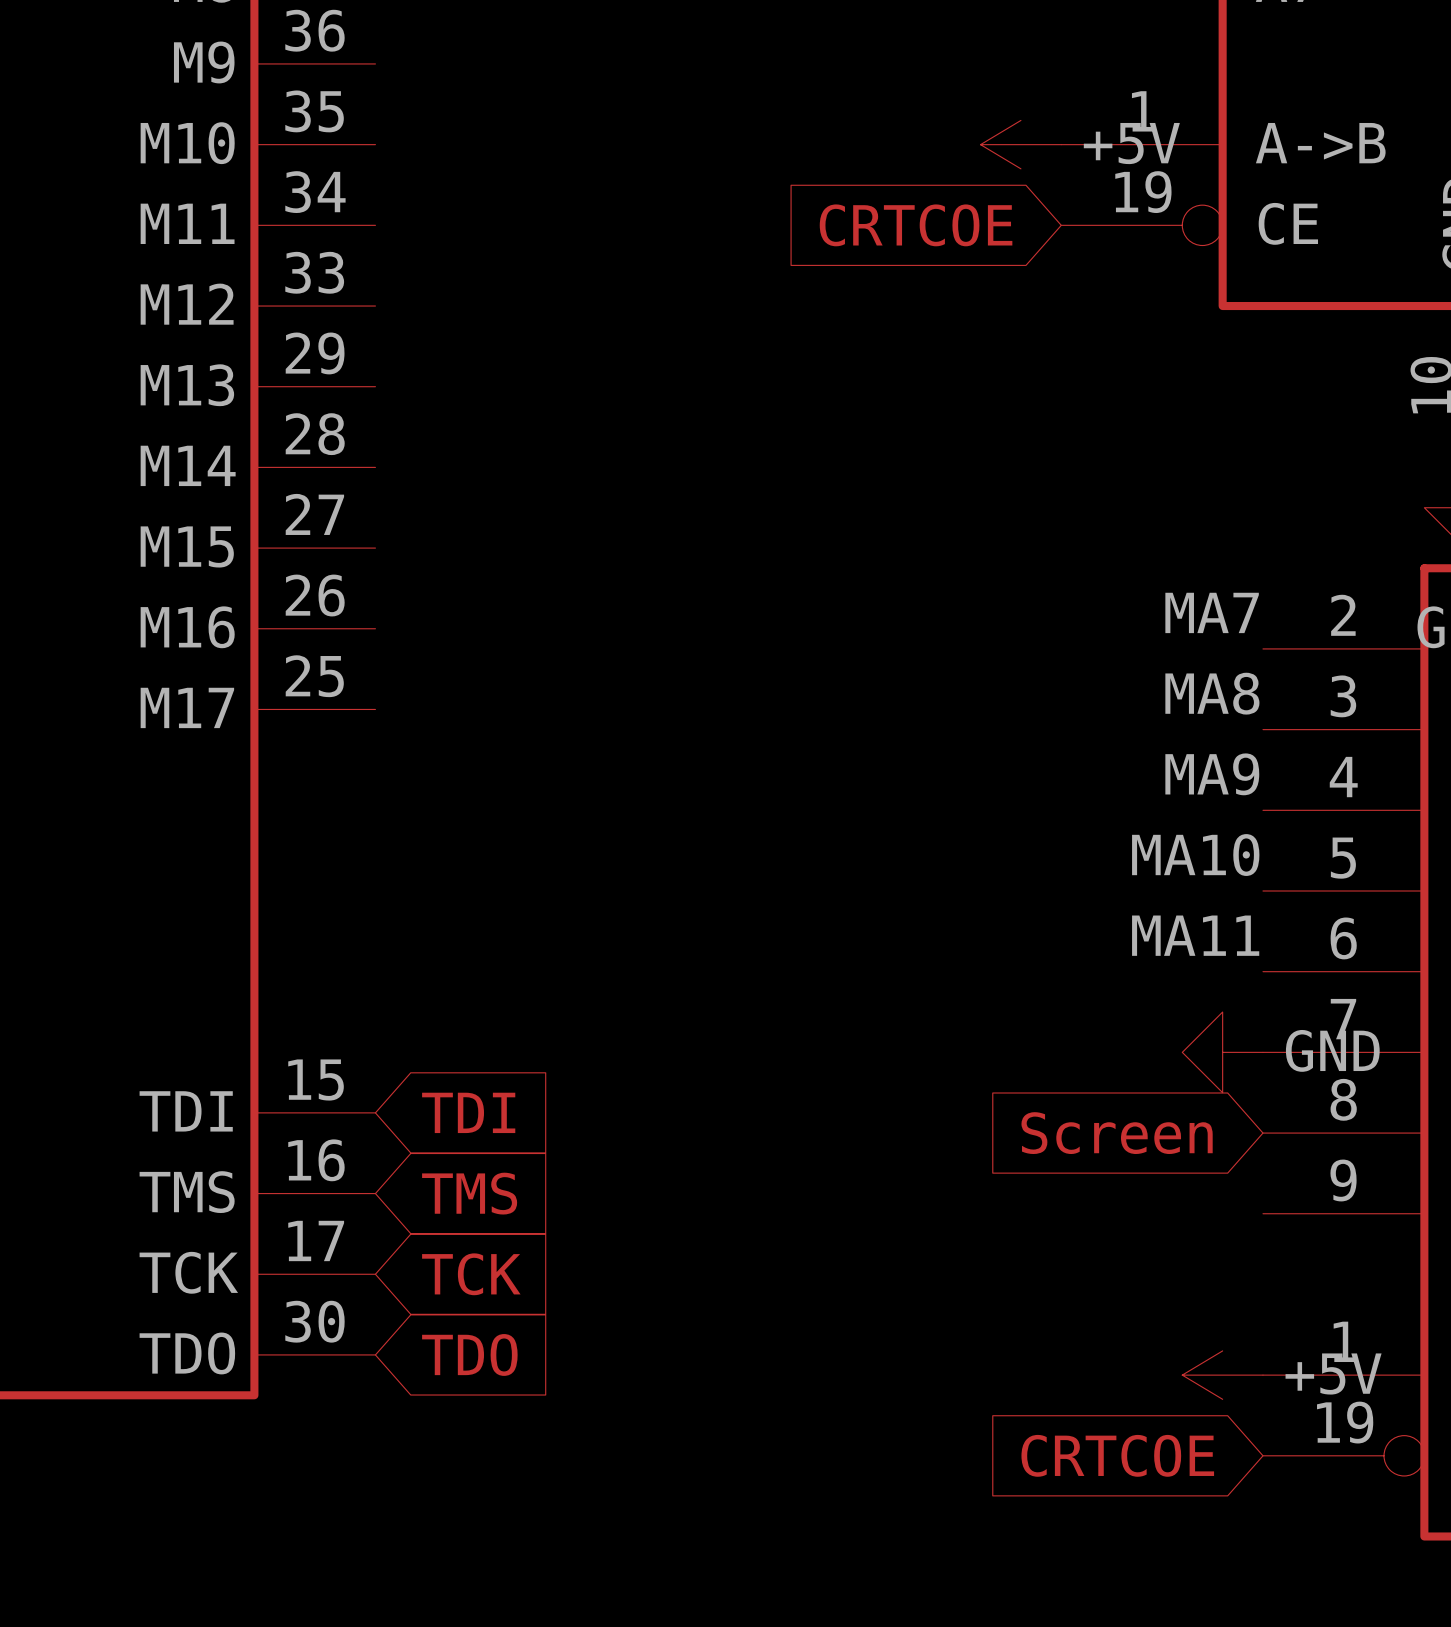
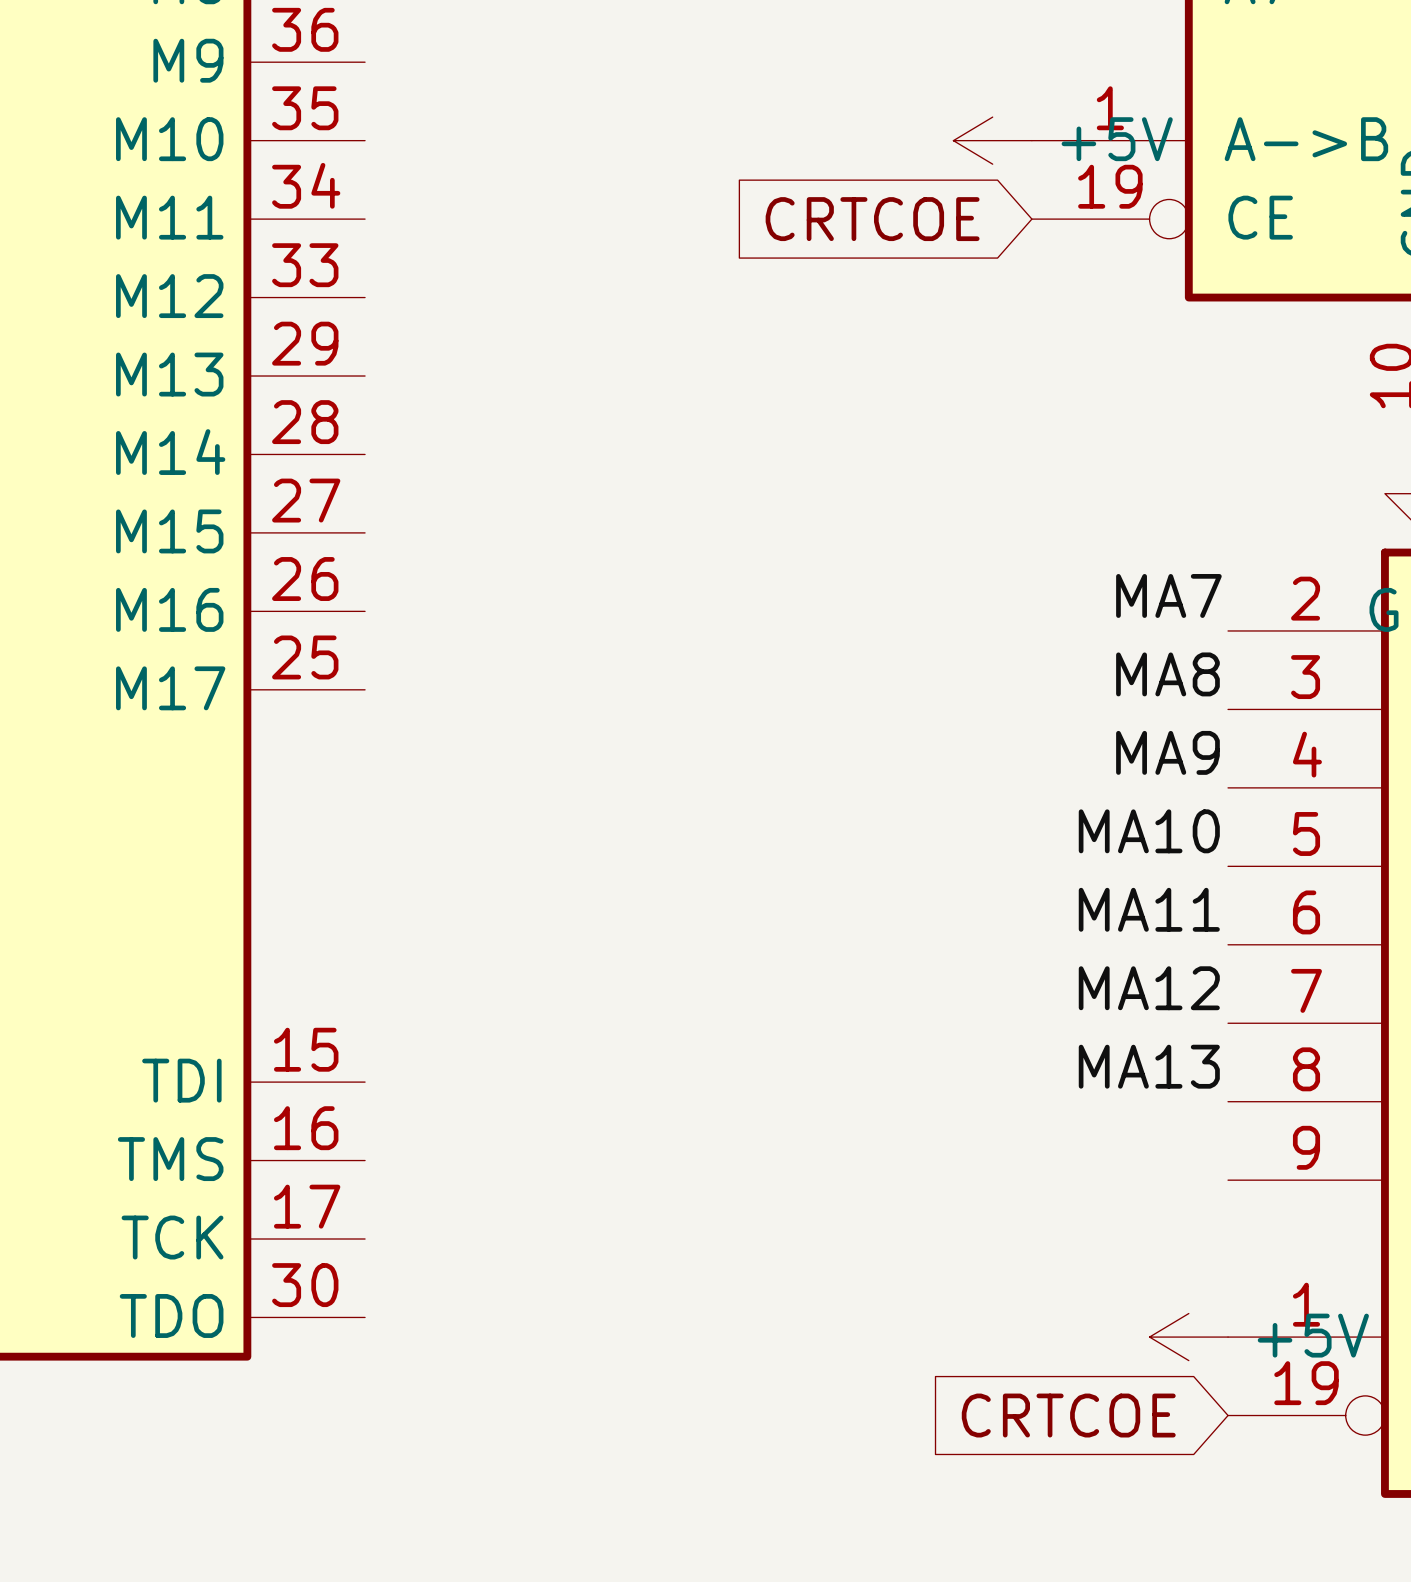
label: none -> MA12 (1149, 988)
power symbol: GND (1222, 1052) -> none
label: none -> MA13 (1149, 1066)
global label: TDI (468, 1112) -> none
global label: Screen (1117, 1133) -> none
global label: TMS (469, 1193) -> none
global label: TCK (471, 1274) -> none
global label: TDO (469, 1354) -> none

